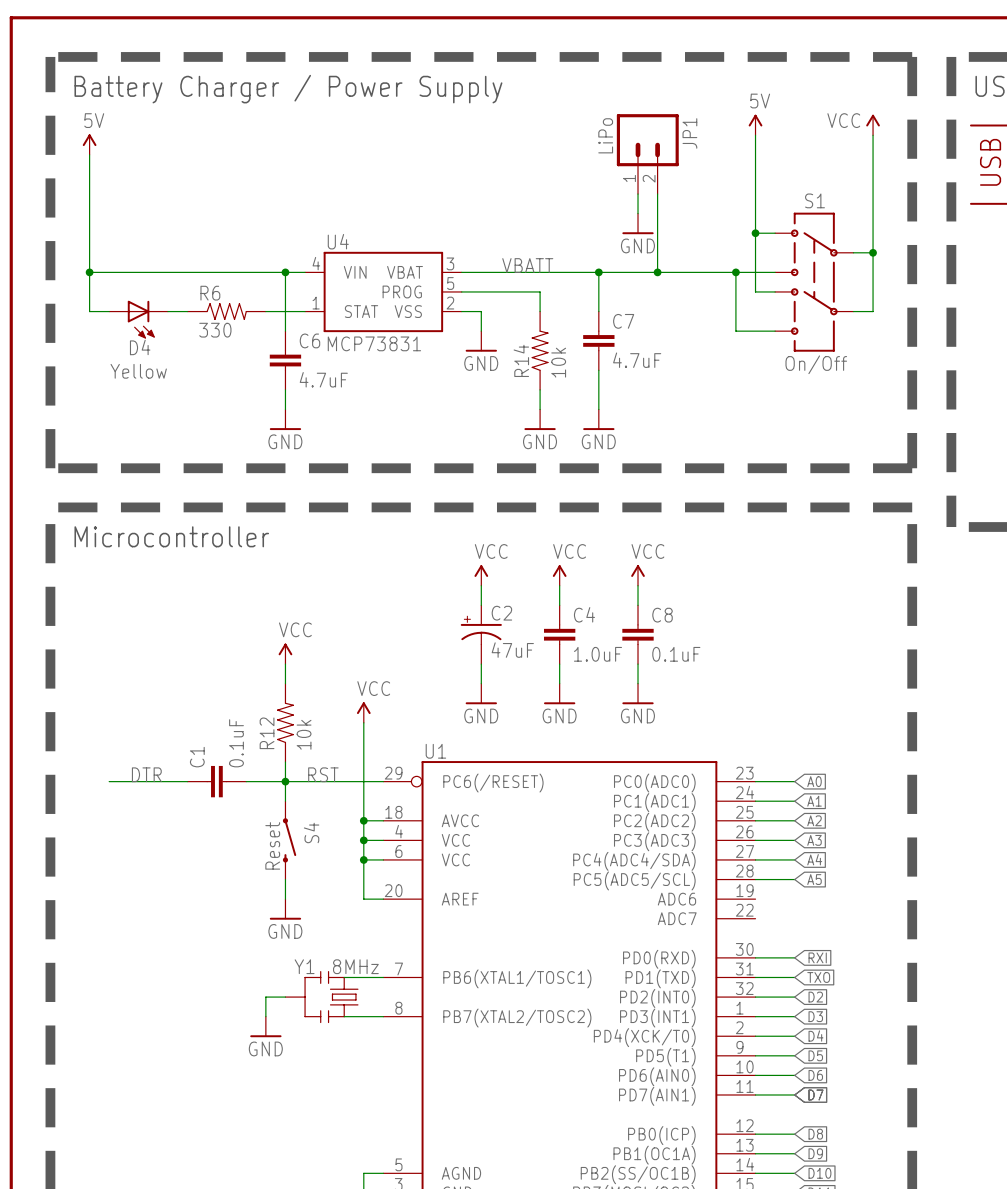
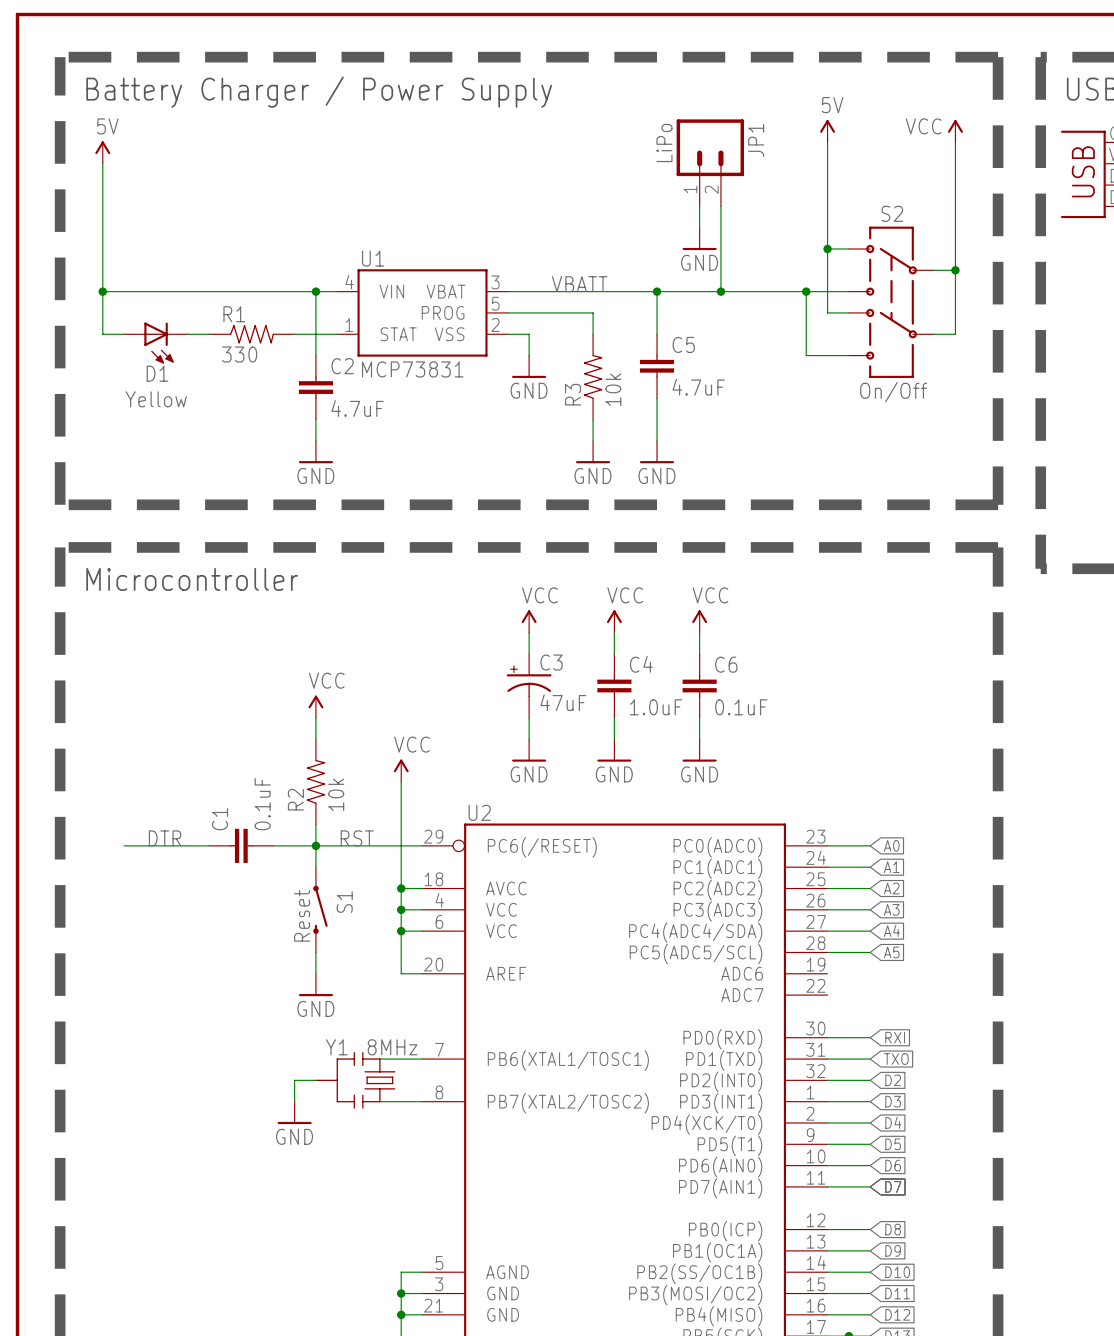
S1 name: S1 (815, 200) -> S2 (892, 213)
U4 name: U4 (338, 241) -> U1 (373, 258)
R6 name: R6 (210, 293) -> R1 (234, 314)
C7 name: C7 (623, 321) -> C5 (683, 344)
C6 name: C6 (309, 340) -> C2 (342, 366)
D4 name: D4 (140, 347) -> D1 (157, 373)
R14 name: R14 (521, 360) -> R3 (573, 394)
C2 name: C2 (501, 613) -> C3 (551, 662)
C8 name: C8 (662, 615) -> C6 (726, 664)
R12 name: R12 (267, 733) -> R2 (295, 799)
U1 name: U1 (435, 751) -> U2 (479, 812)
S4 name: S4 (311, 832) -> S1 (344, 902)

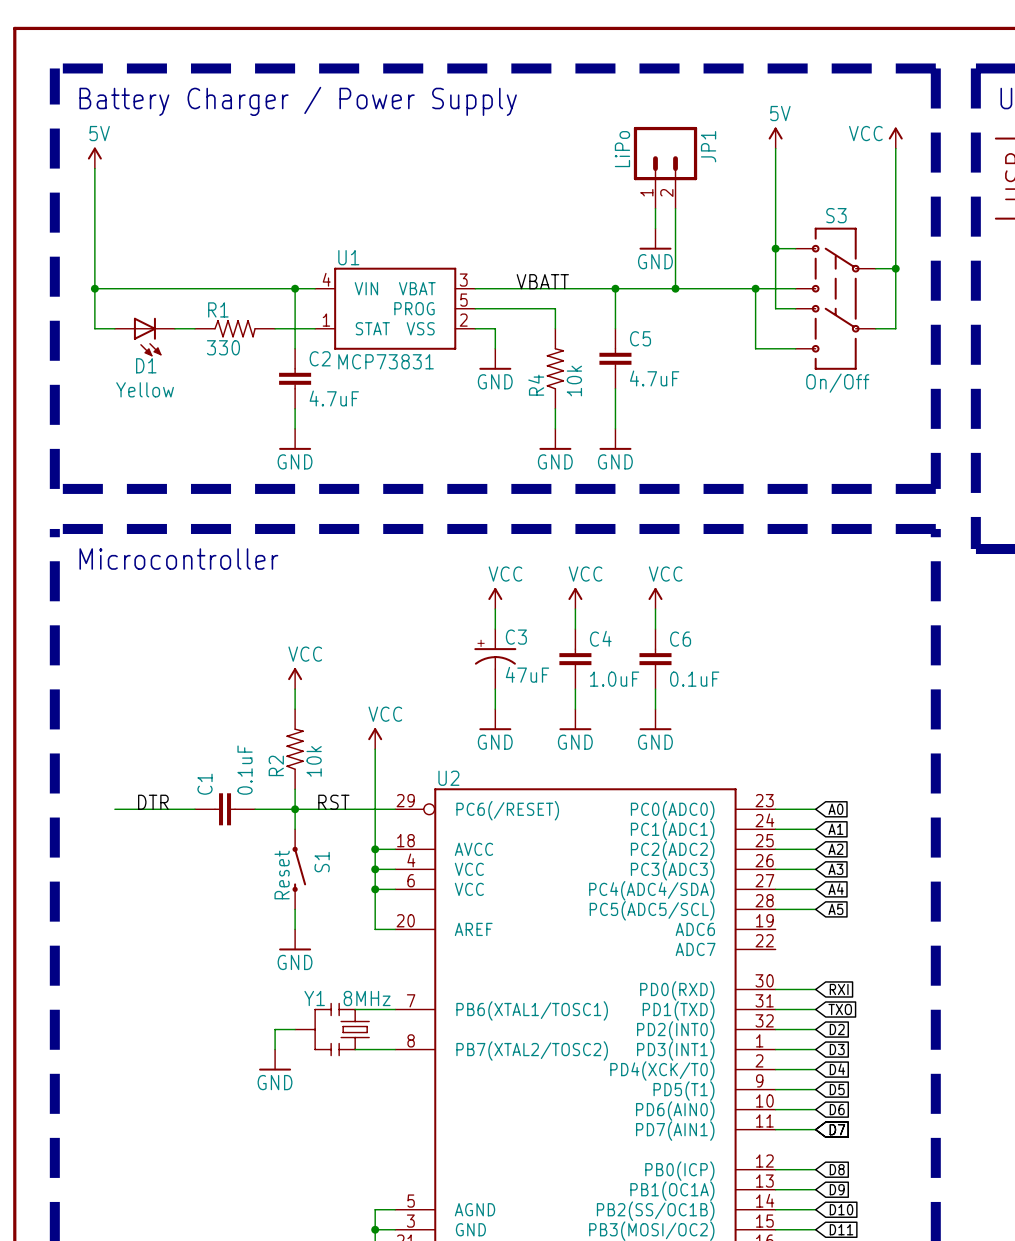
S2 name: S2 (892, 213) -> S3 (836, 215)
R3 name: R3 (573, 394) -> R4 (536, 385)

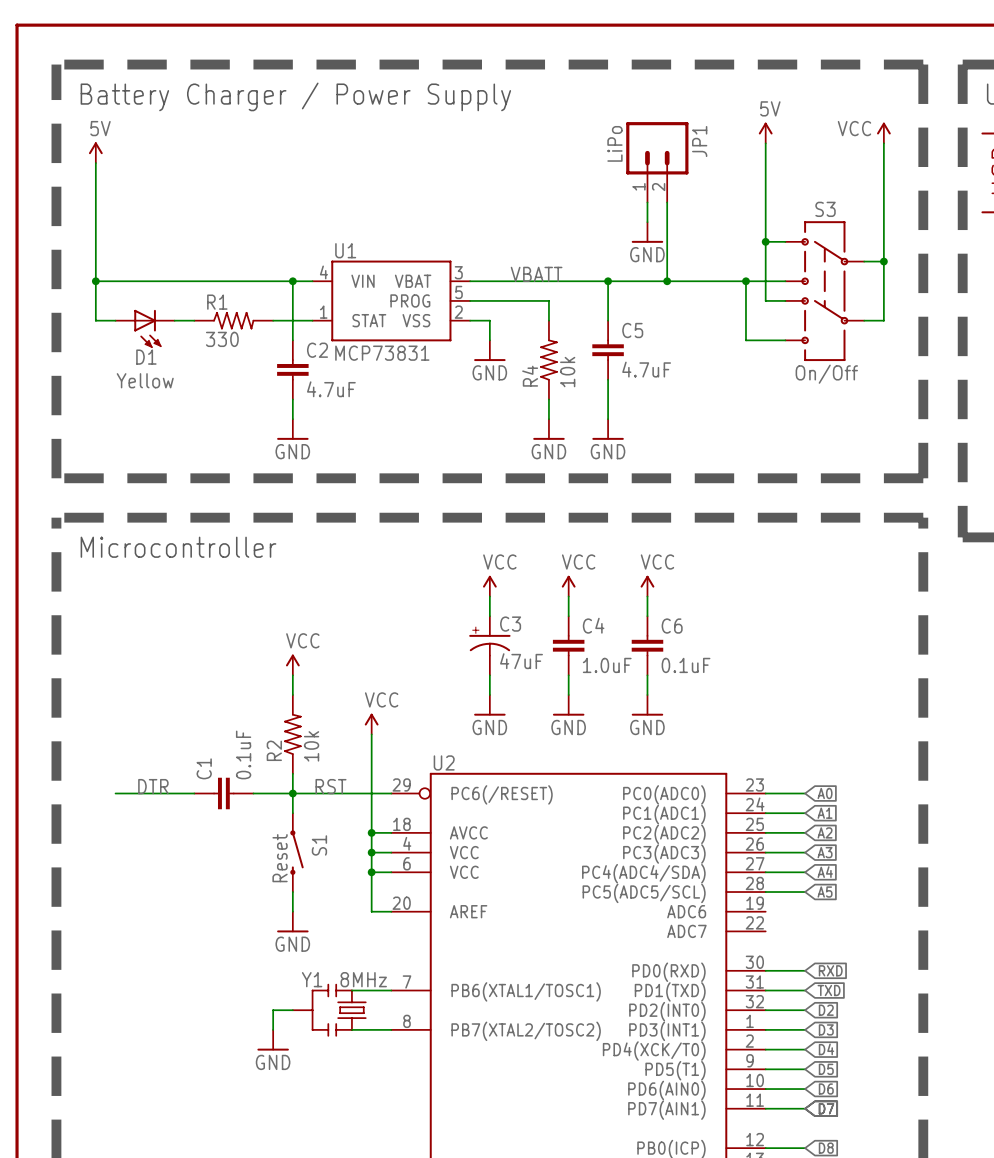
global label: RXI (839, 989) -> RXD (830, 970)
global label: TXO (840, 1009) -> TXD (829, 990)

